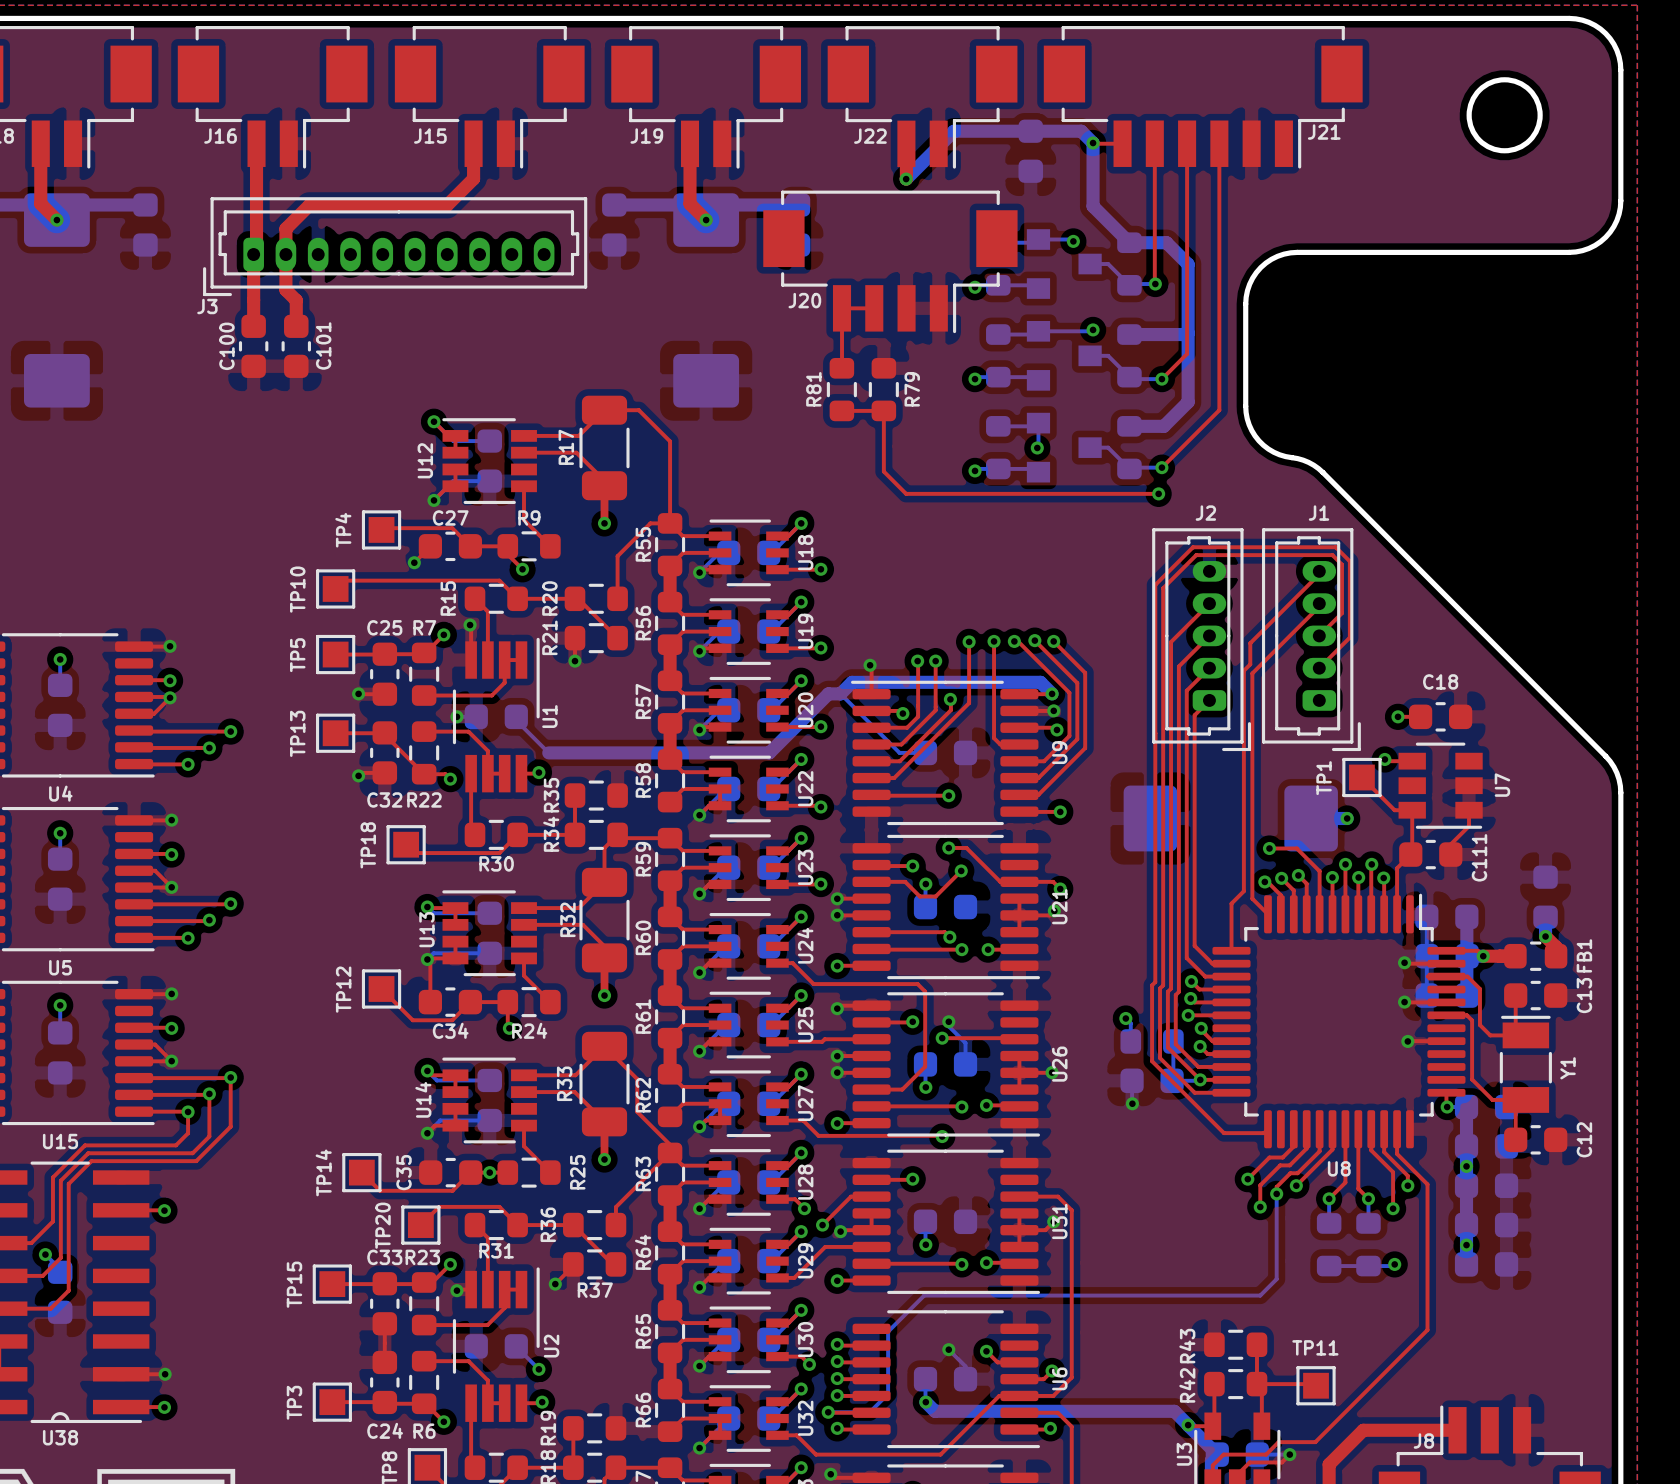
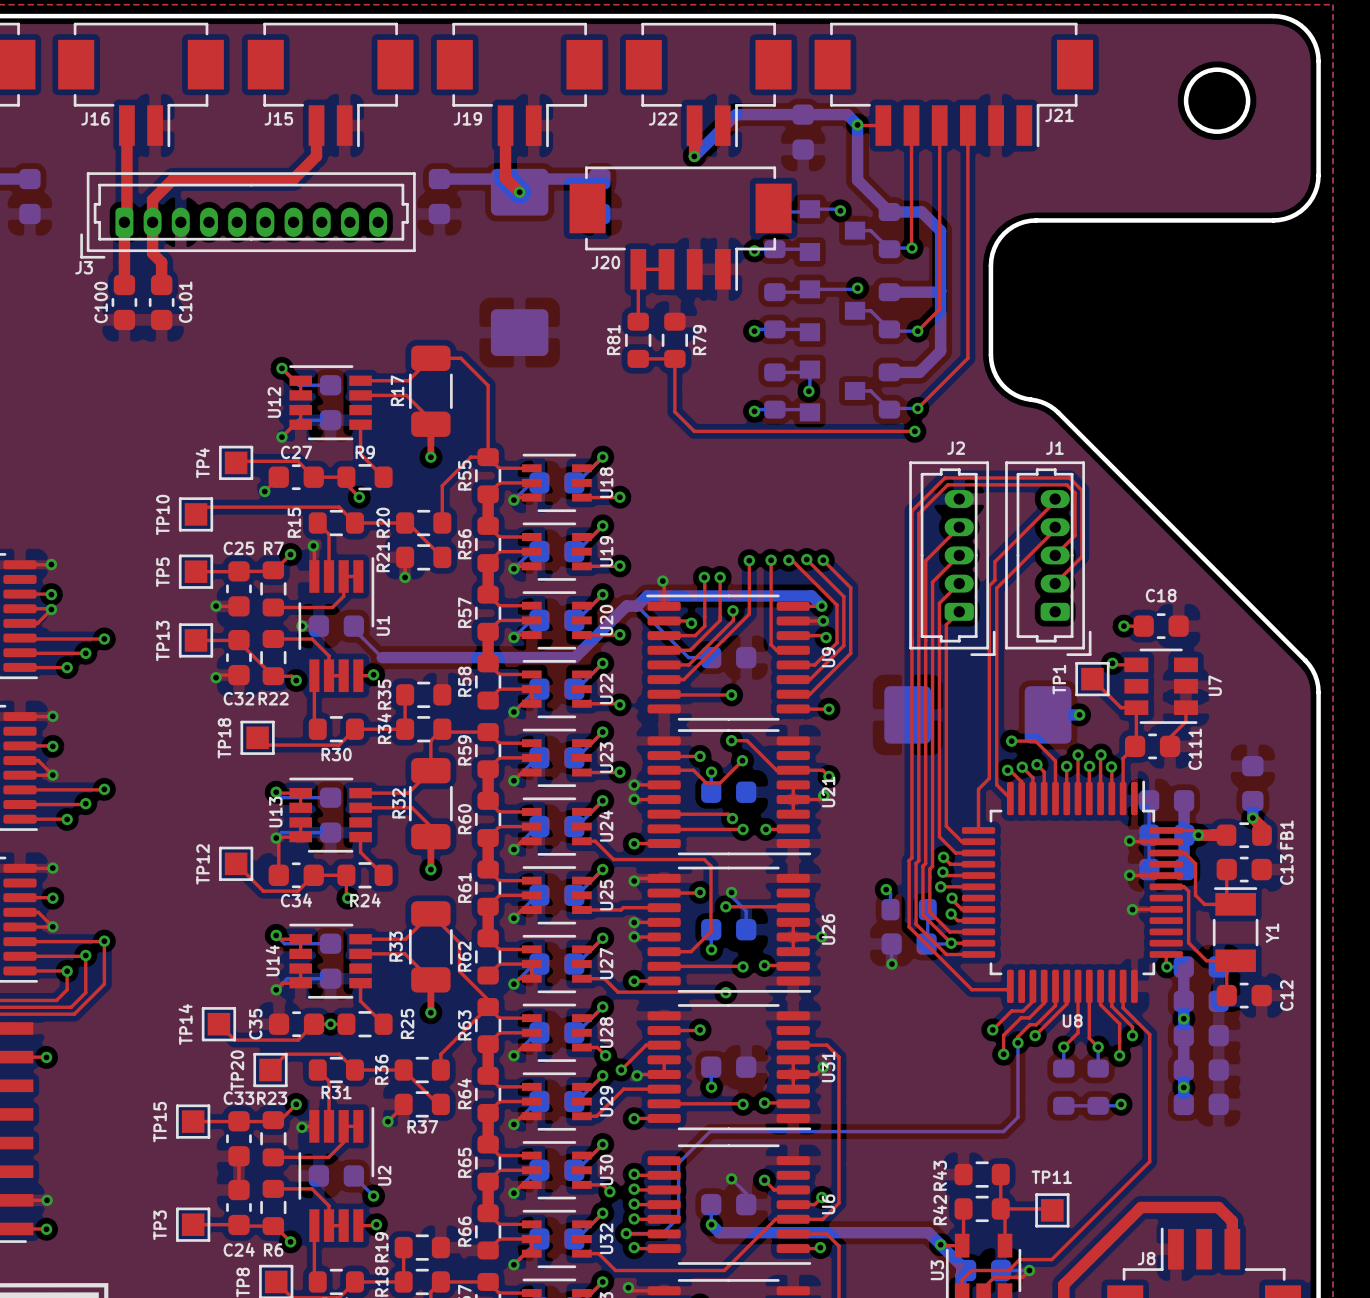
top track: (1457, 1430) (1363, 1430) (1329, 1464) (1329, 1470) -> (1232, 1249) (1232, 1221) (1218, 1207) (1141, 1207) (1063, 1284)

